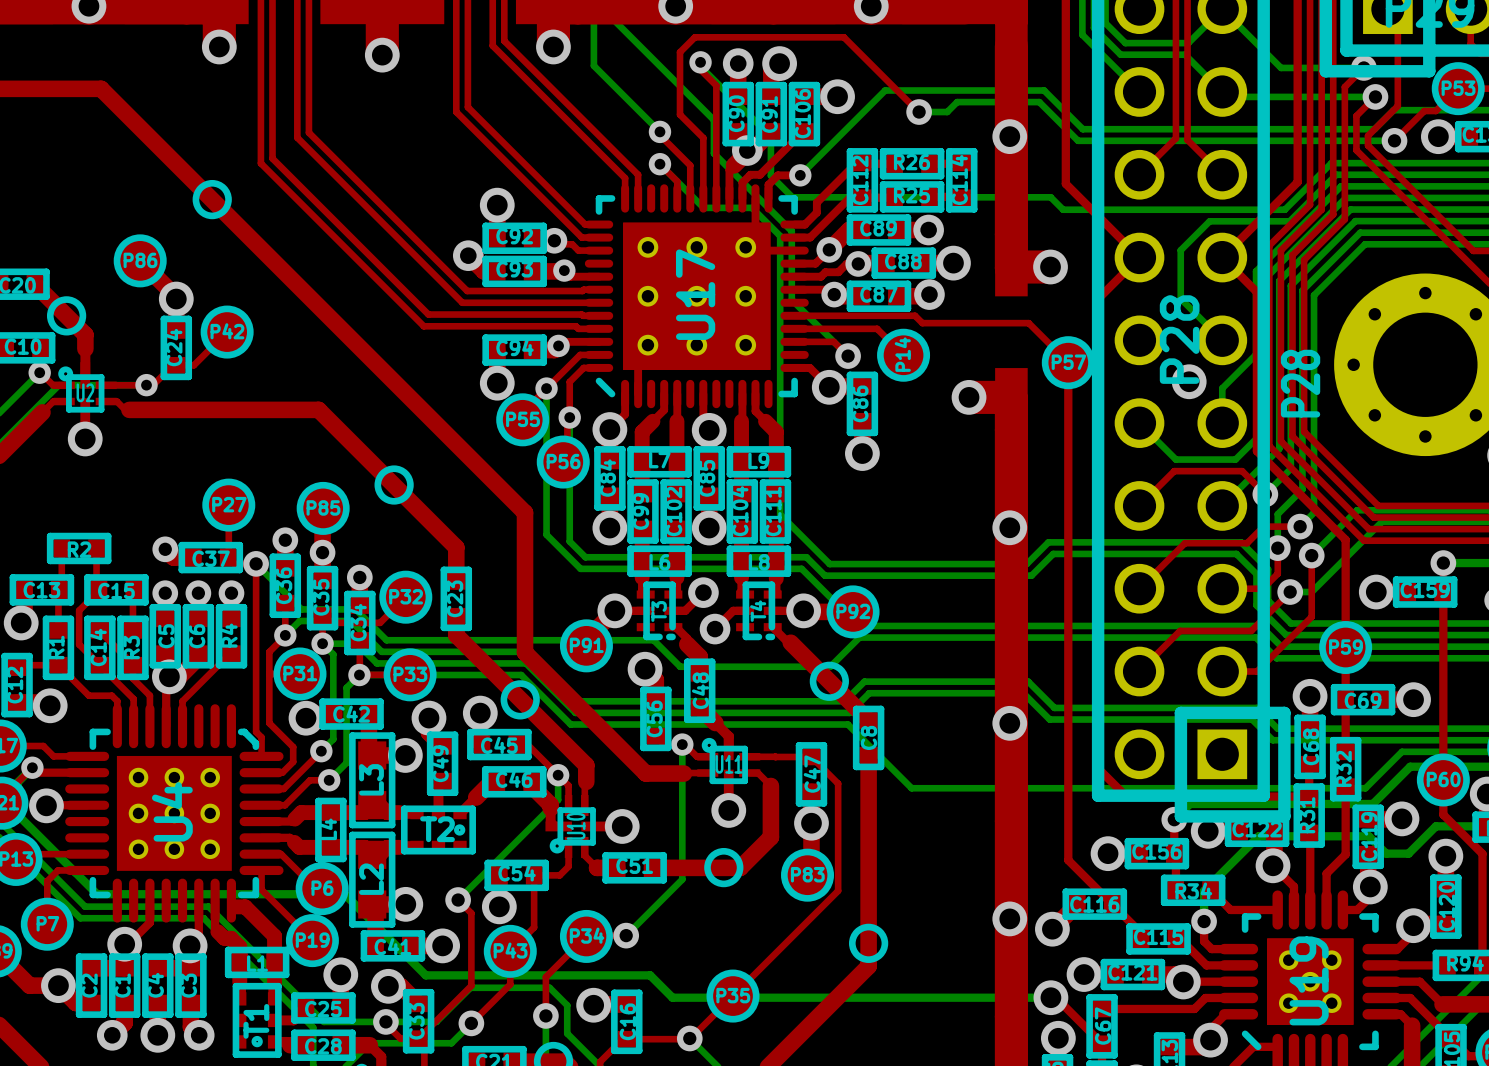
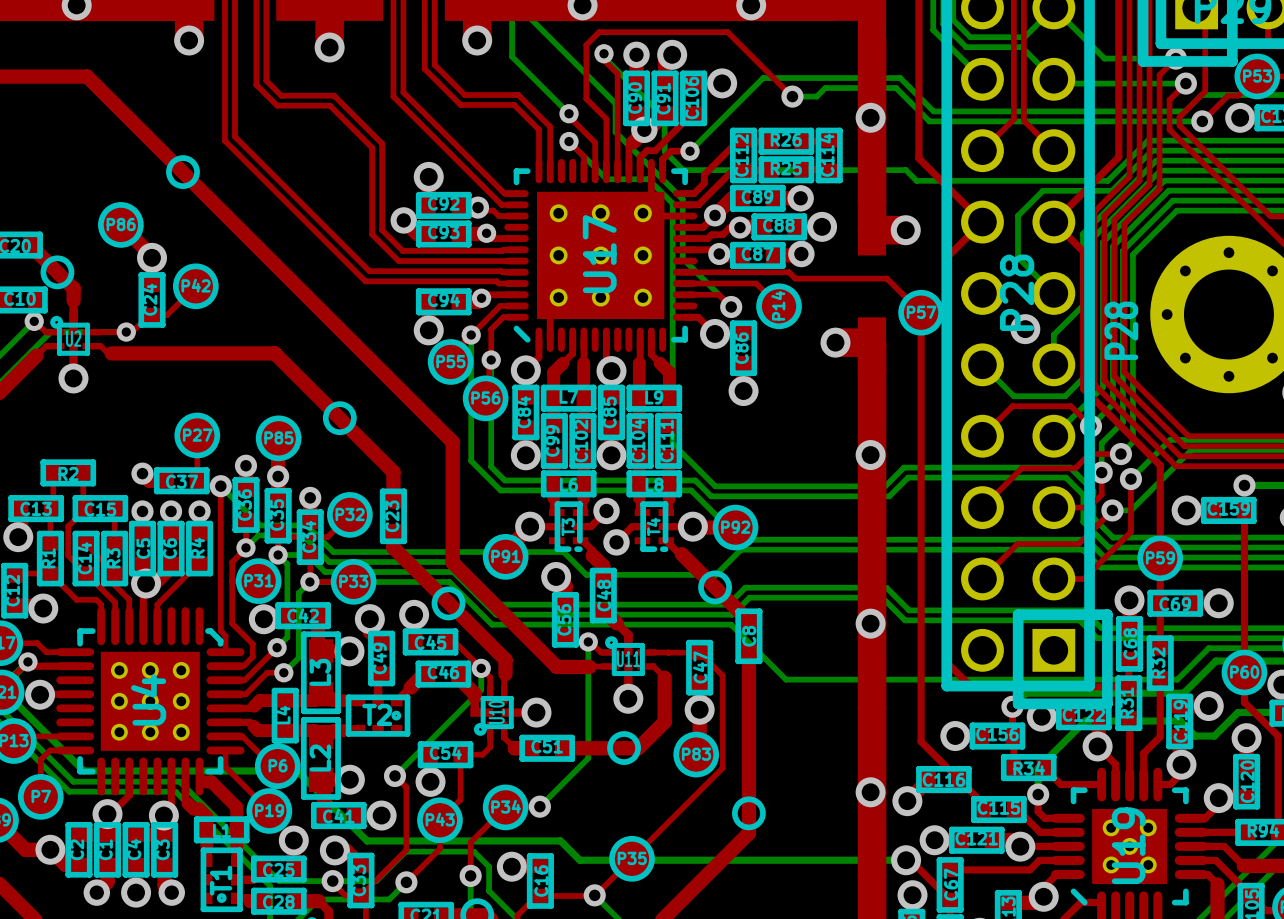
top track: (504, 40) (638, 174) -> (434, 35) (434, 65) (464, 94) (518, 94) (550, 126) (550, 150)
top track: (492, 45) (625, 178) -> (424, 39) (424, 69) (460, 104) (514, 104) (538, 129) (538, 153)
top track: (308, 93) (308, 132) (443, 267) -> (266, 80) (281, 95) (334, 95) (382, 143) (382, 230)
top track: (297, 98) (297, 137) (431, 271) -> (256, 84) (277, 105) (330, 105) (372, 147) (372, 234)

